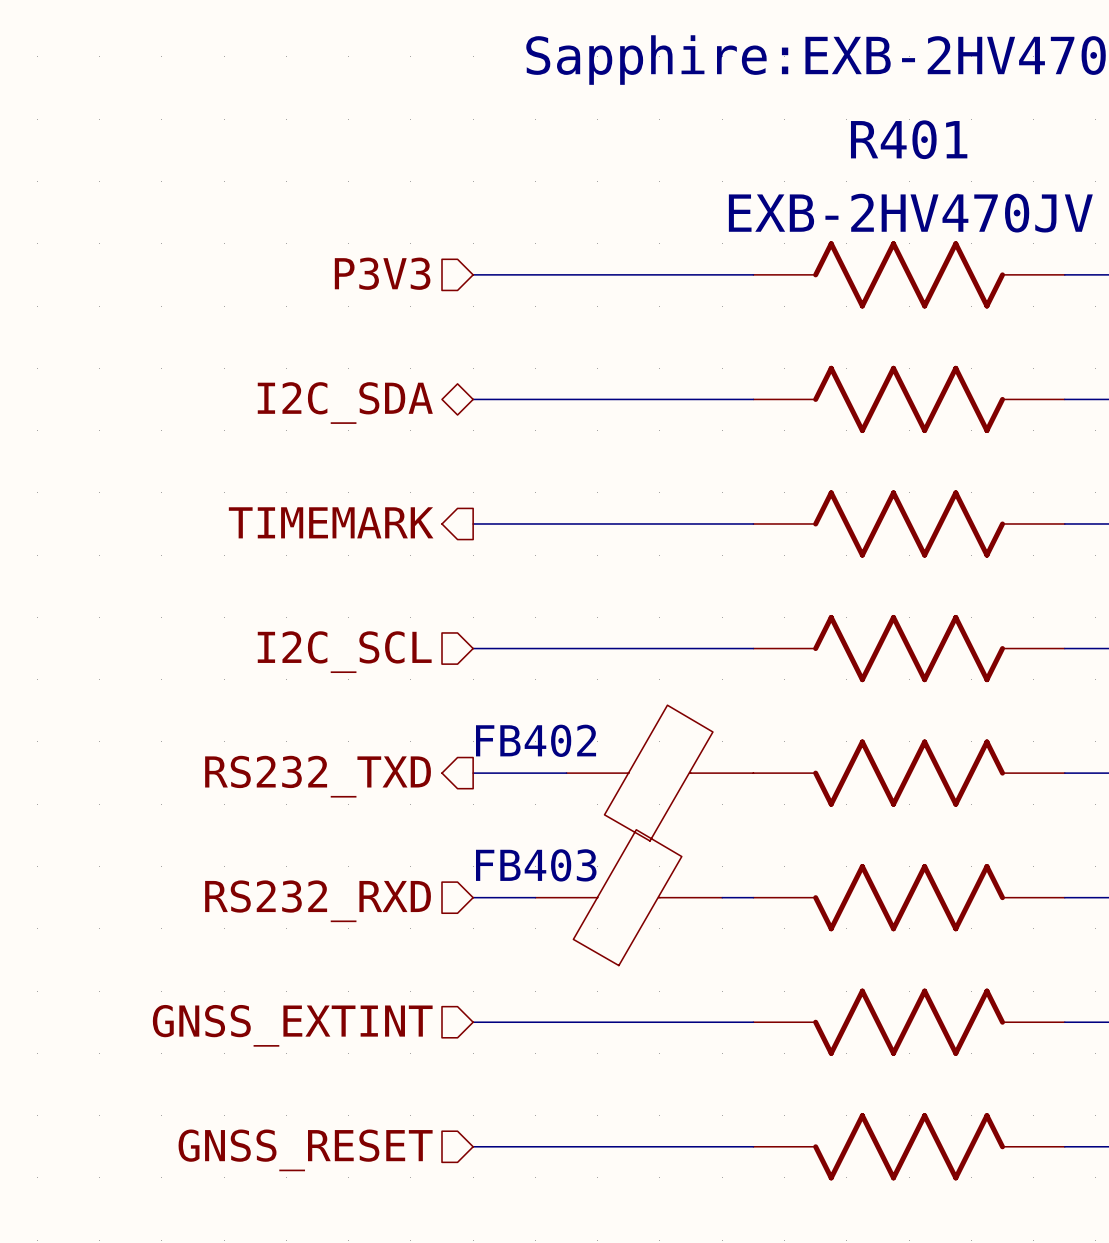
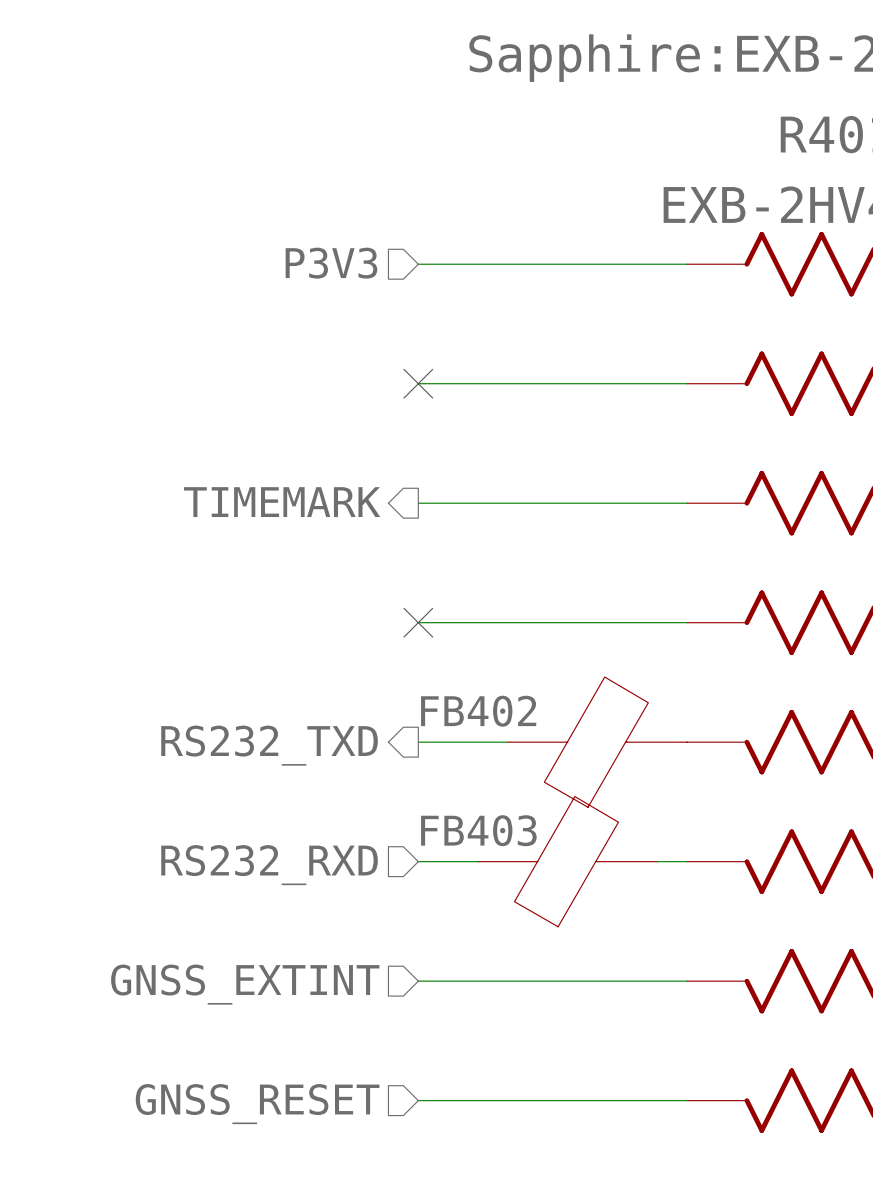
no-connect mark: none -> (418, 383)
hierarchical label: I2C_SDA (345, 403) -> none
no-connect mark: none -> (418, 622)
hierarchical label: I2C_SCL (344, 652) -> none

